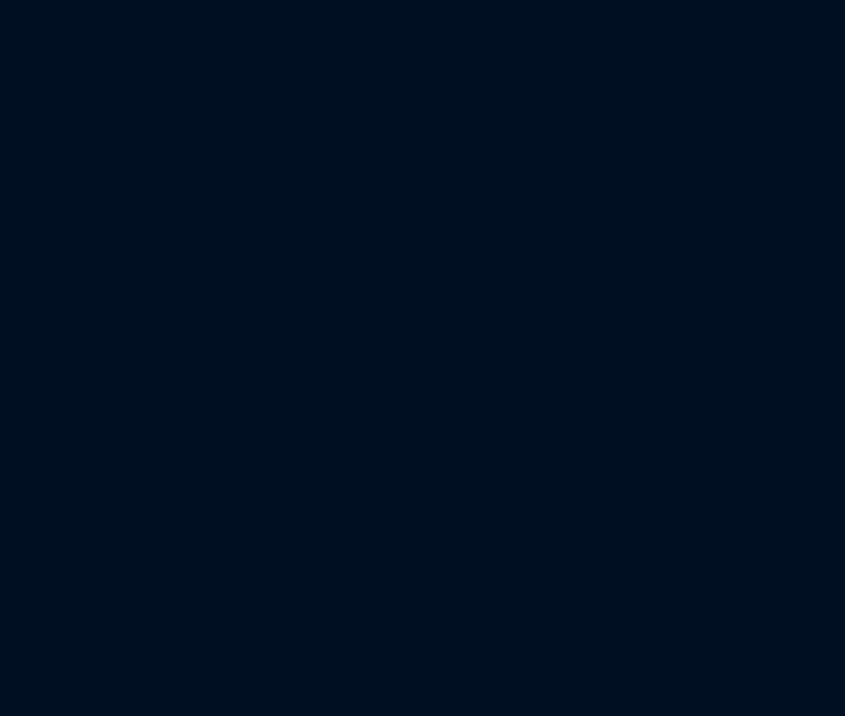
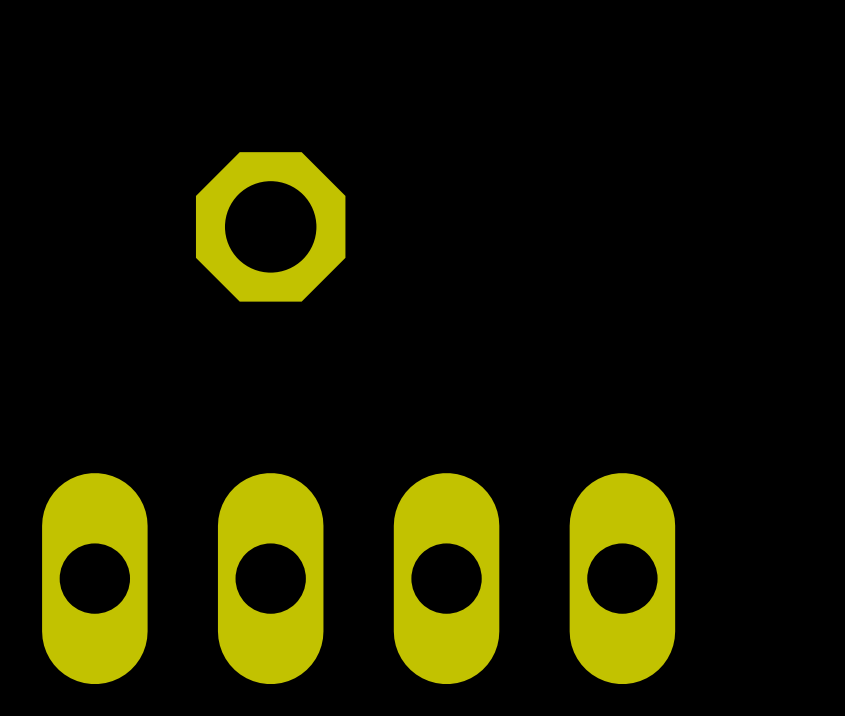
part: none -> (270, 226)
part: none -> (358, 578)

